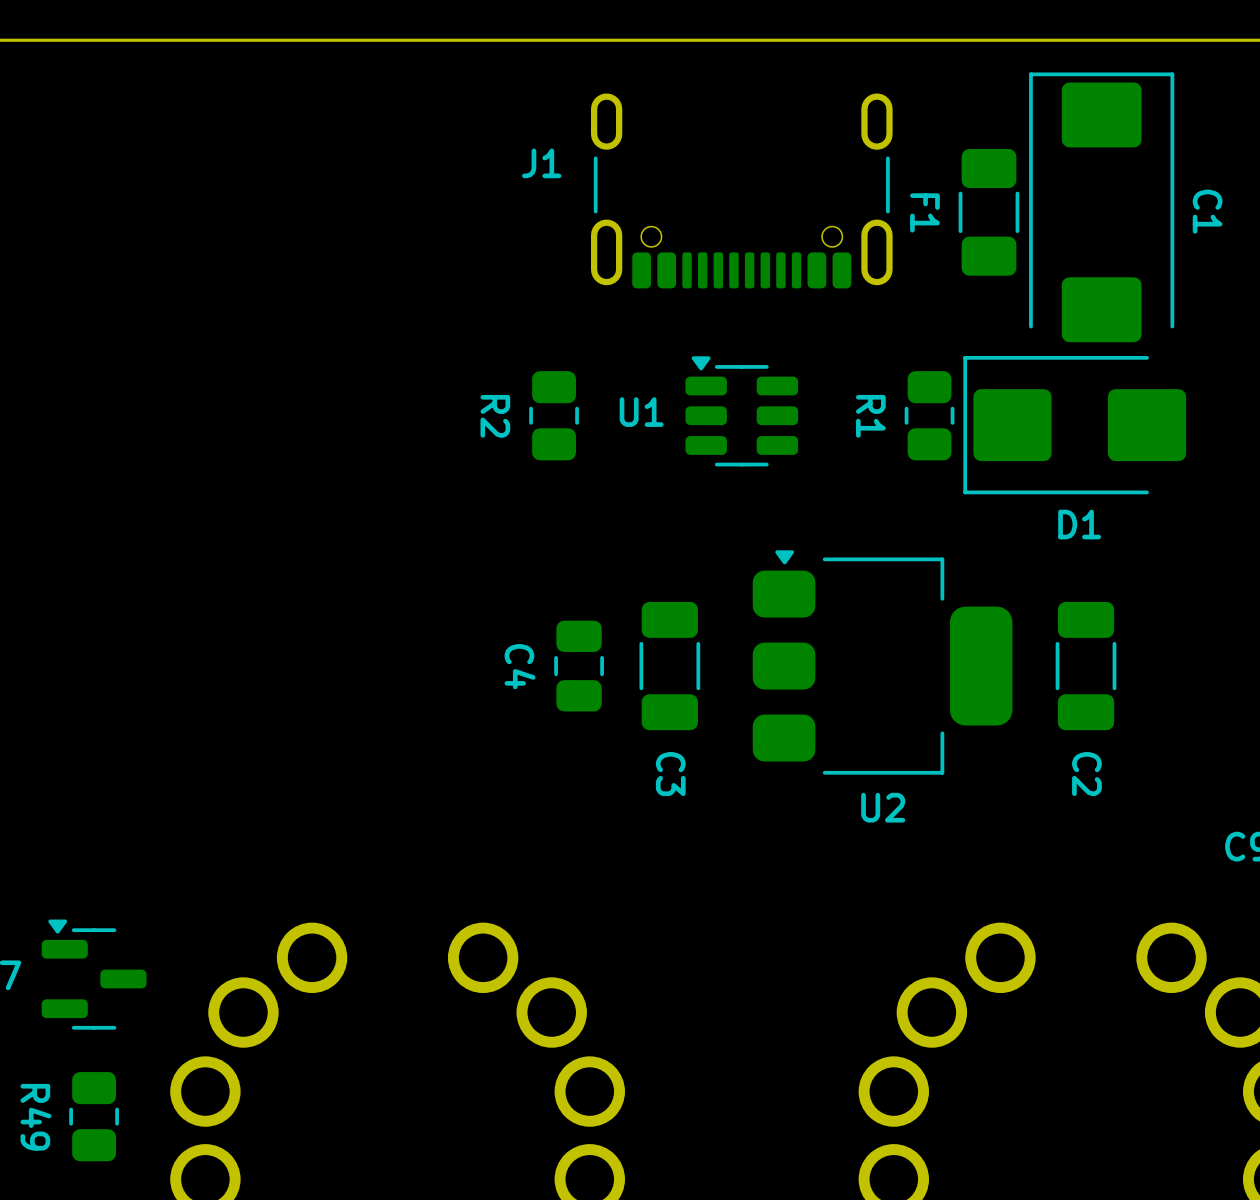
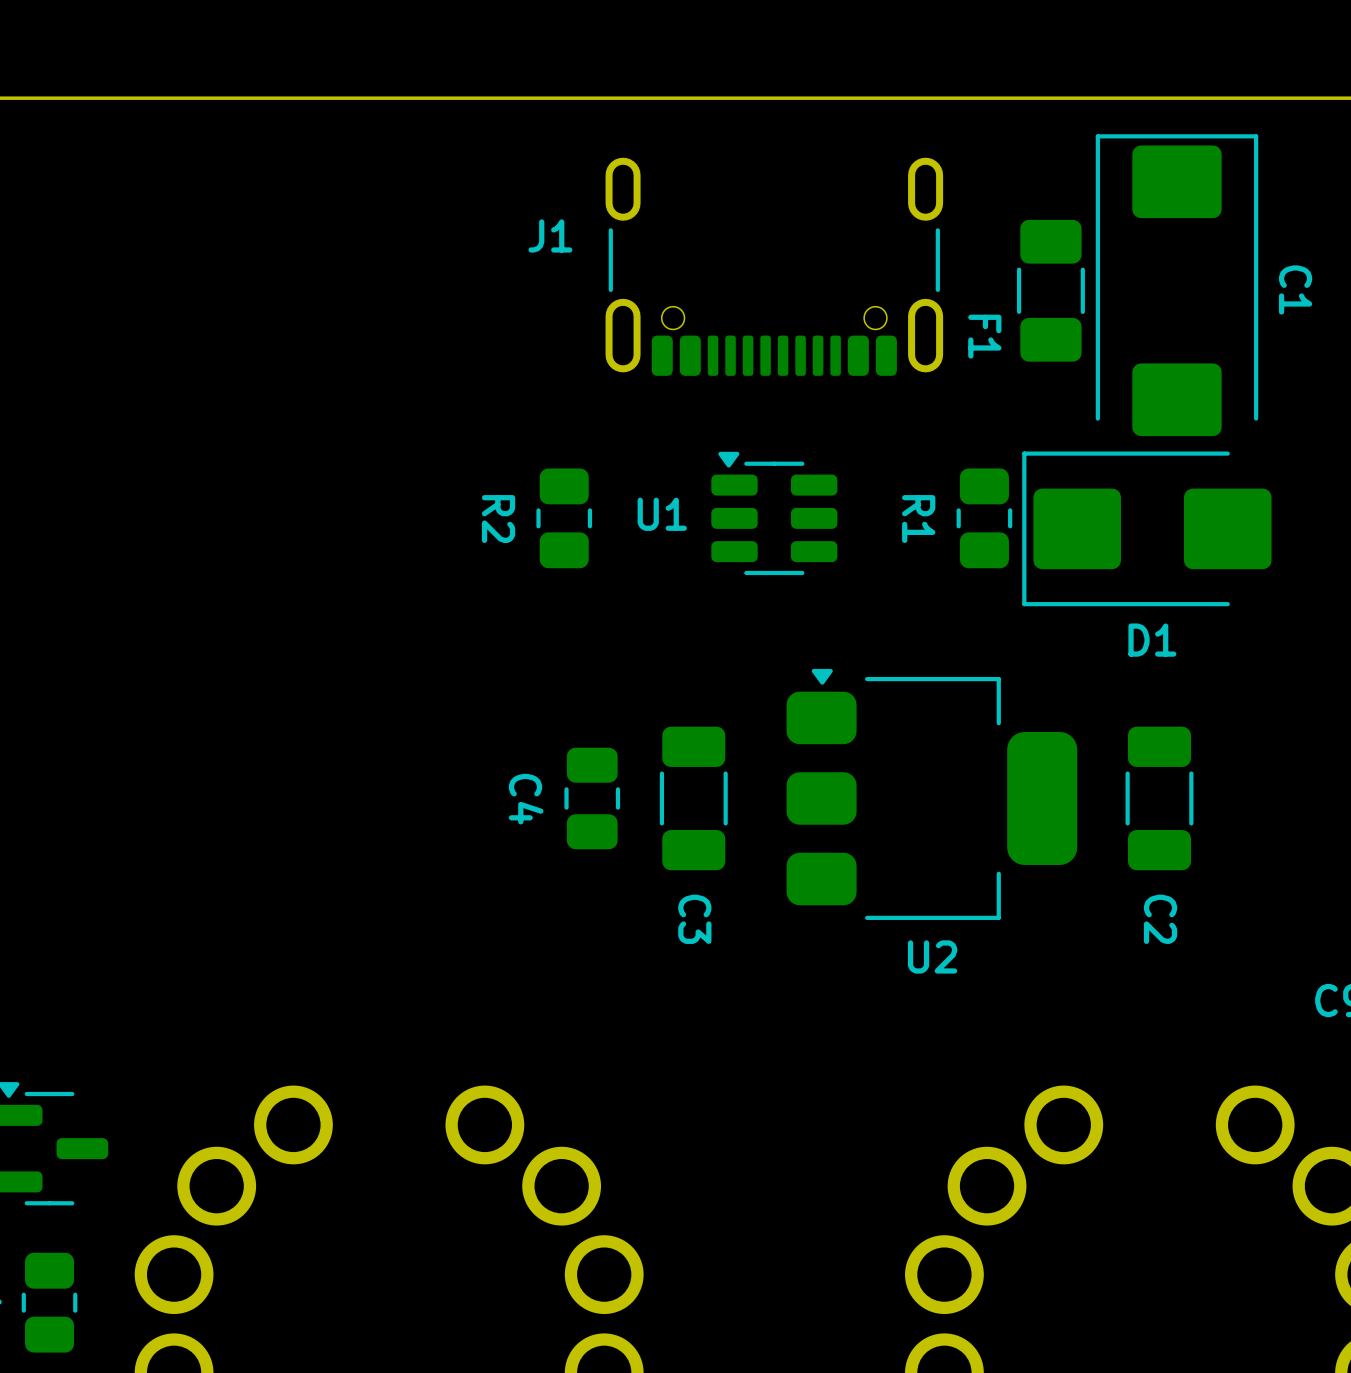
F1 name position: F1 (924, 212) -> F1 (984, 336)

